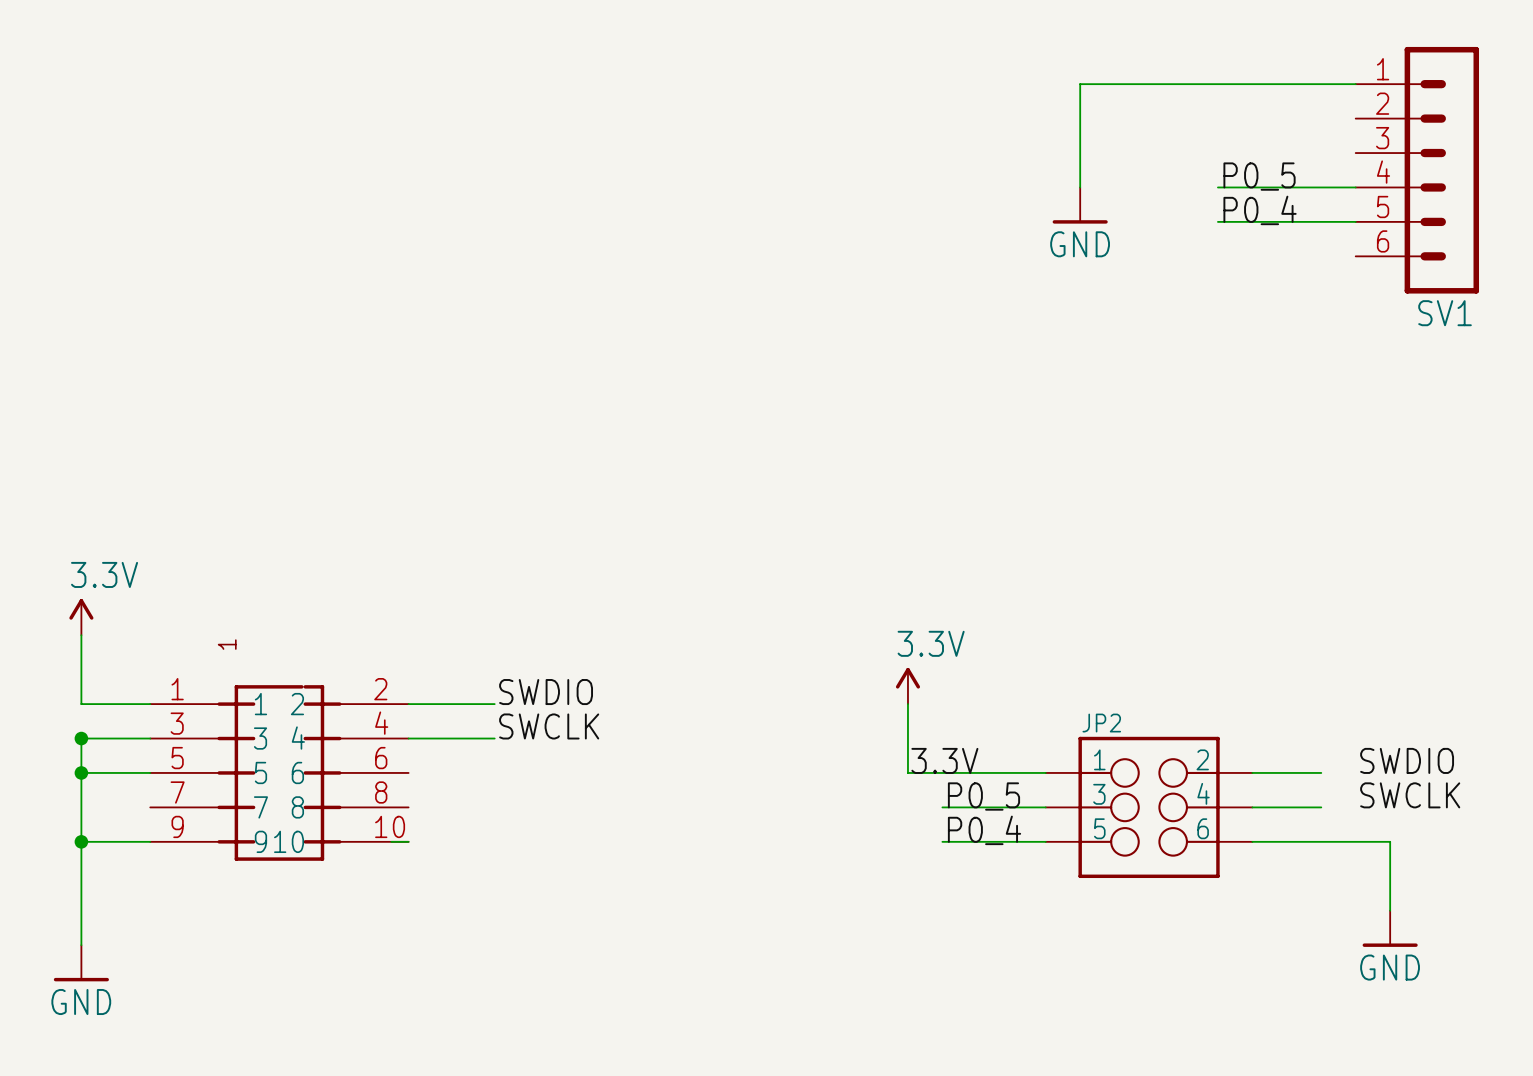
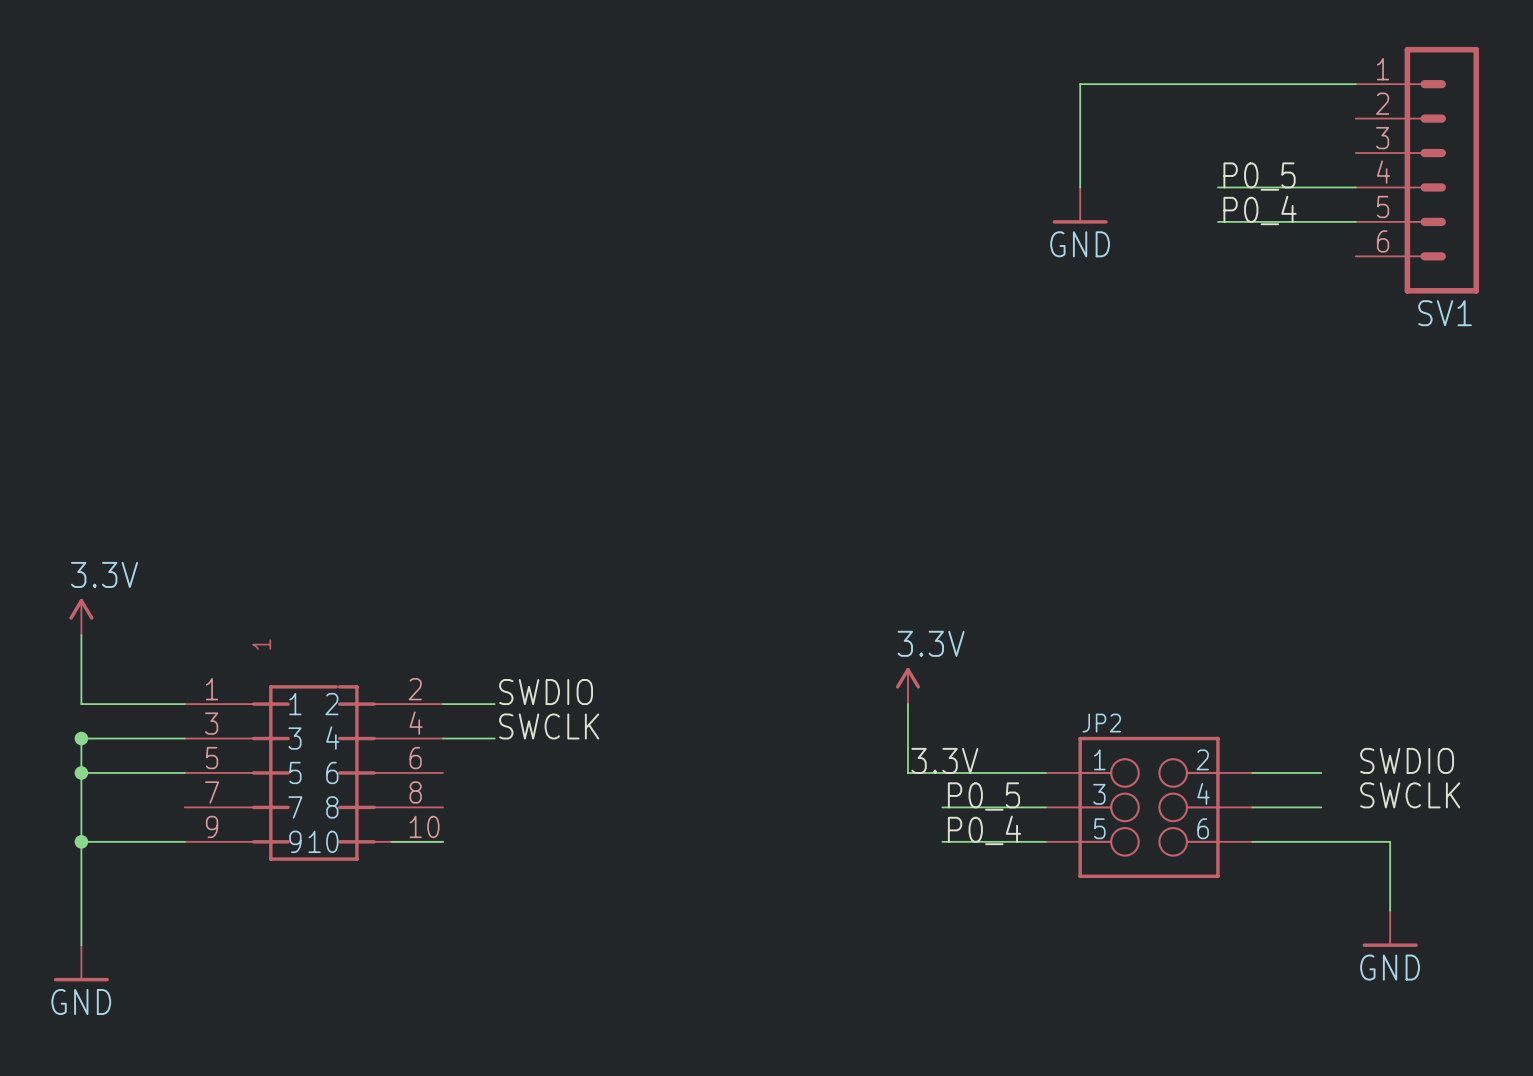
part position: (279, 772) -> (313, 772)
wire: none -> (408, 841) (443, 841)

